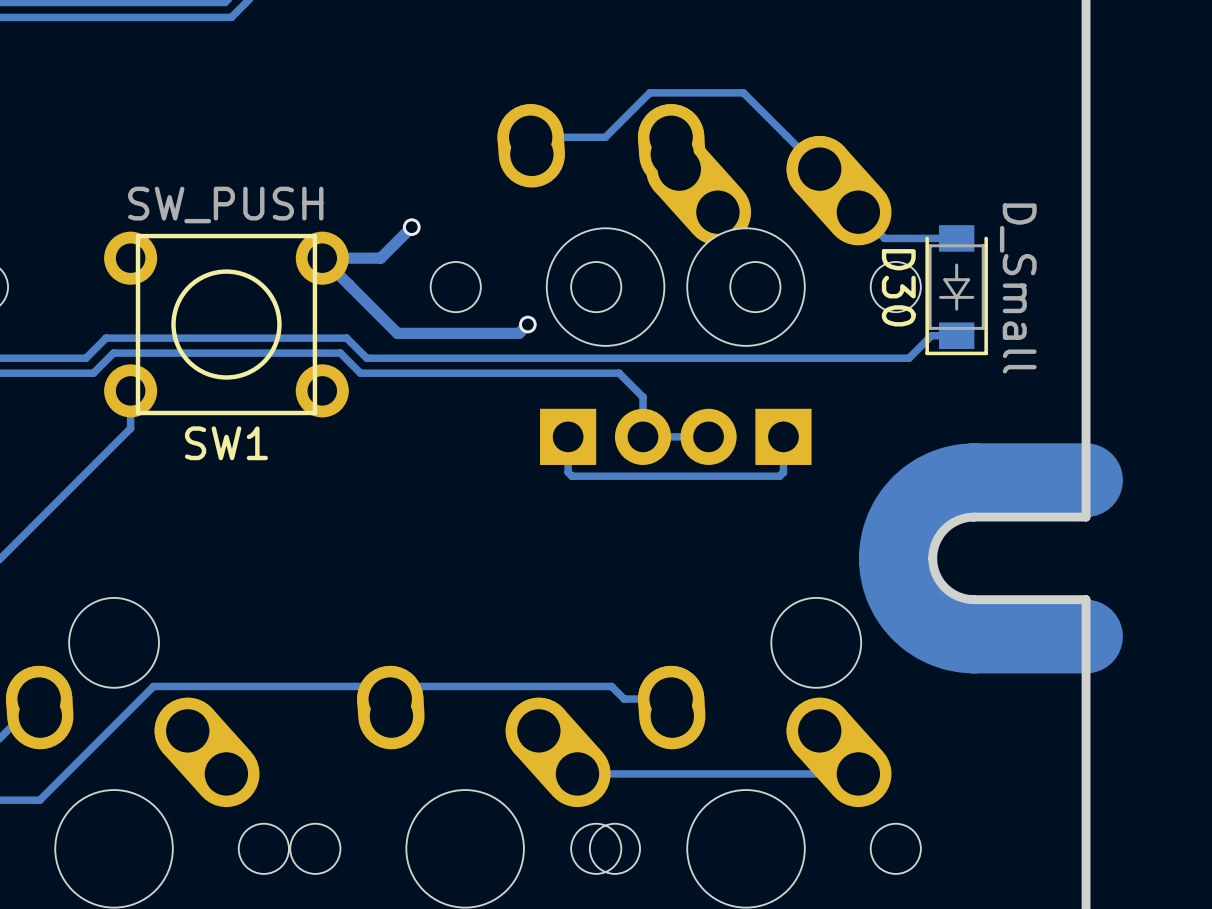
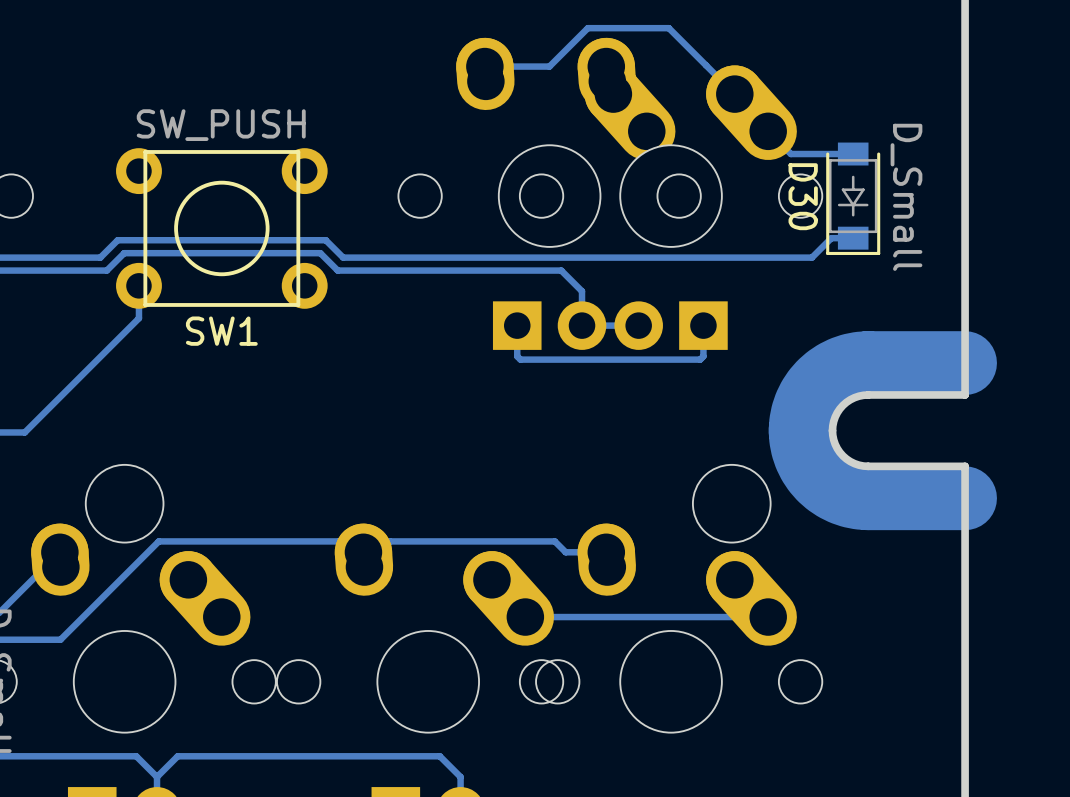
track: (411, 227) (380, 258) (322, 258) (397, 333) (519, 333) (527, 324) -> none
via: (411, 227) -> none
via: (527, 324) -> none

